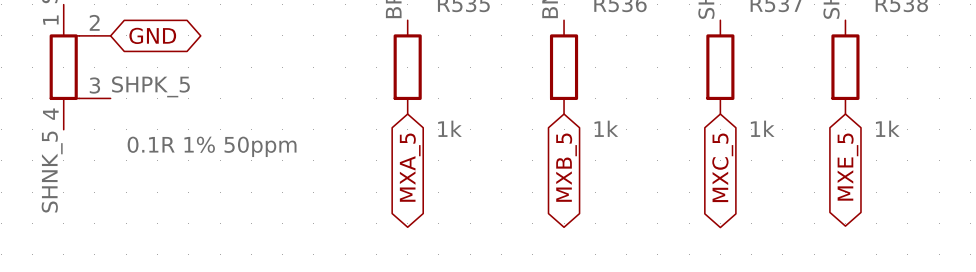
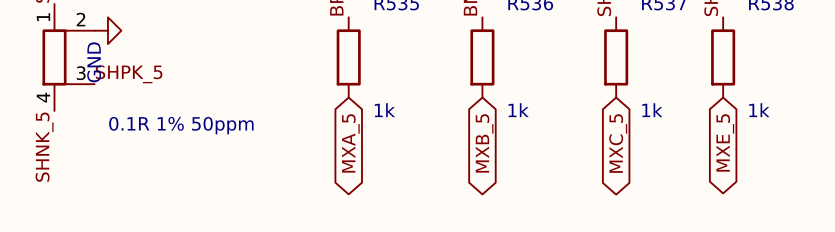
power symbol: none -> GND (107, 30)
global label: GND (152, 35) -> none

